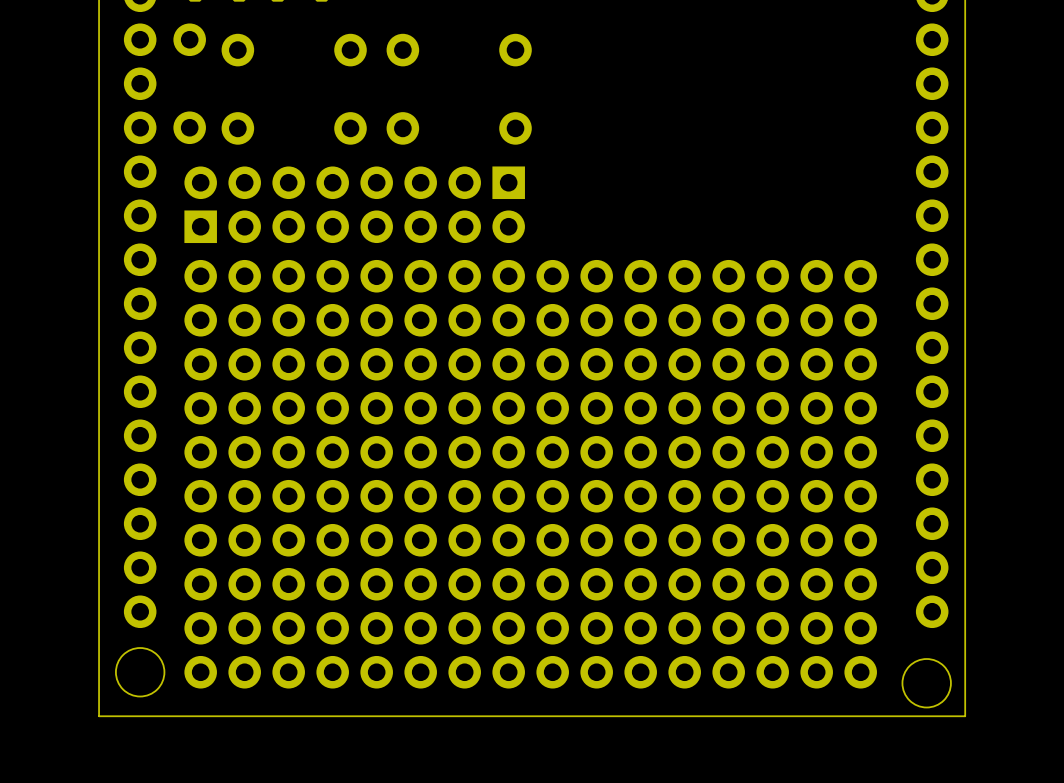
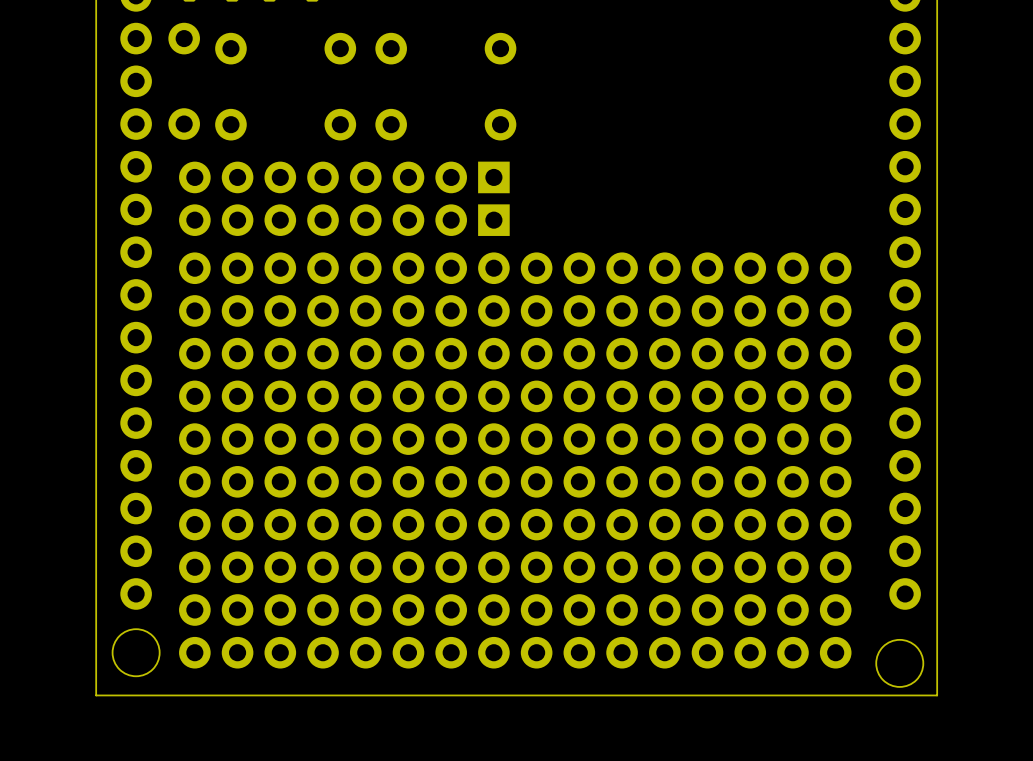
part rotation: 0° (354, 226) -> 180° (344, 220)

